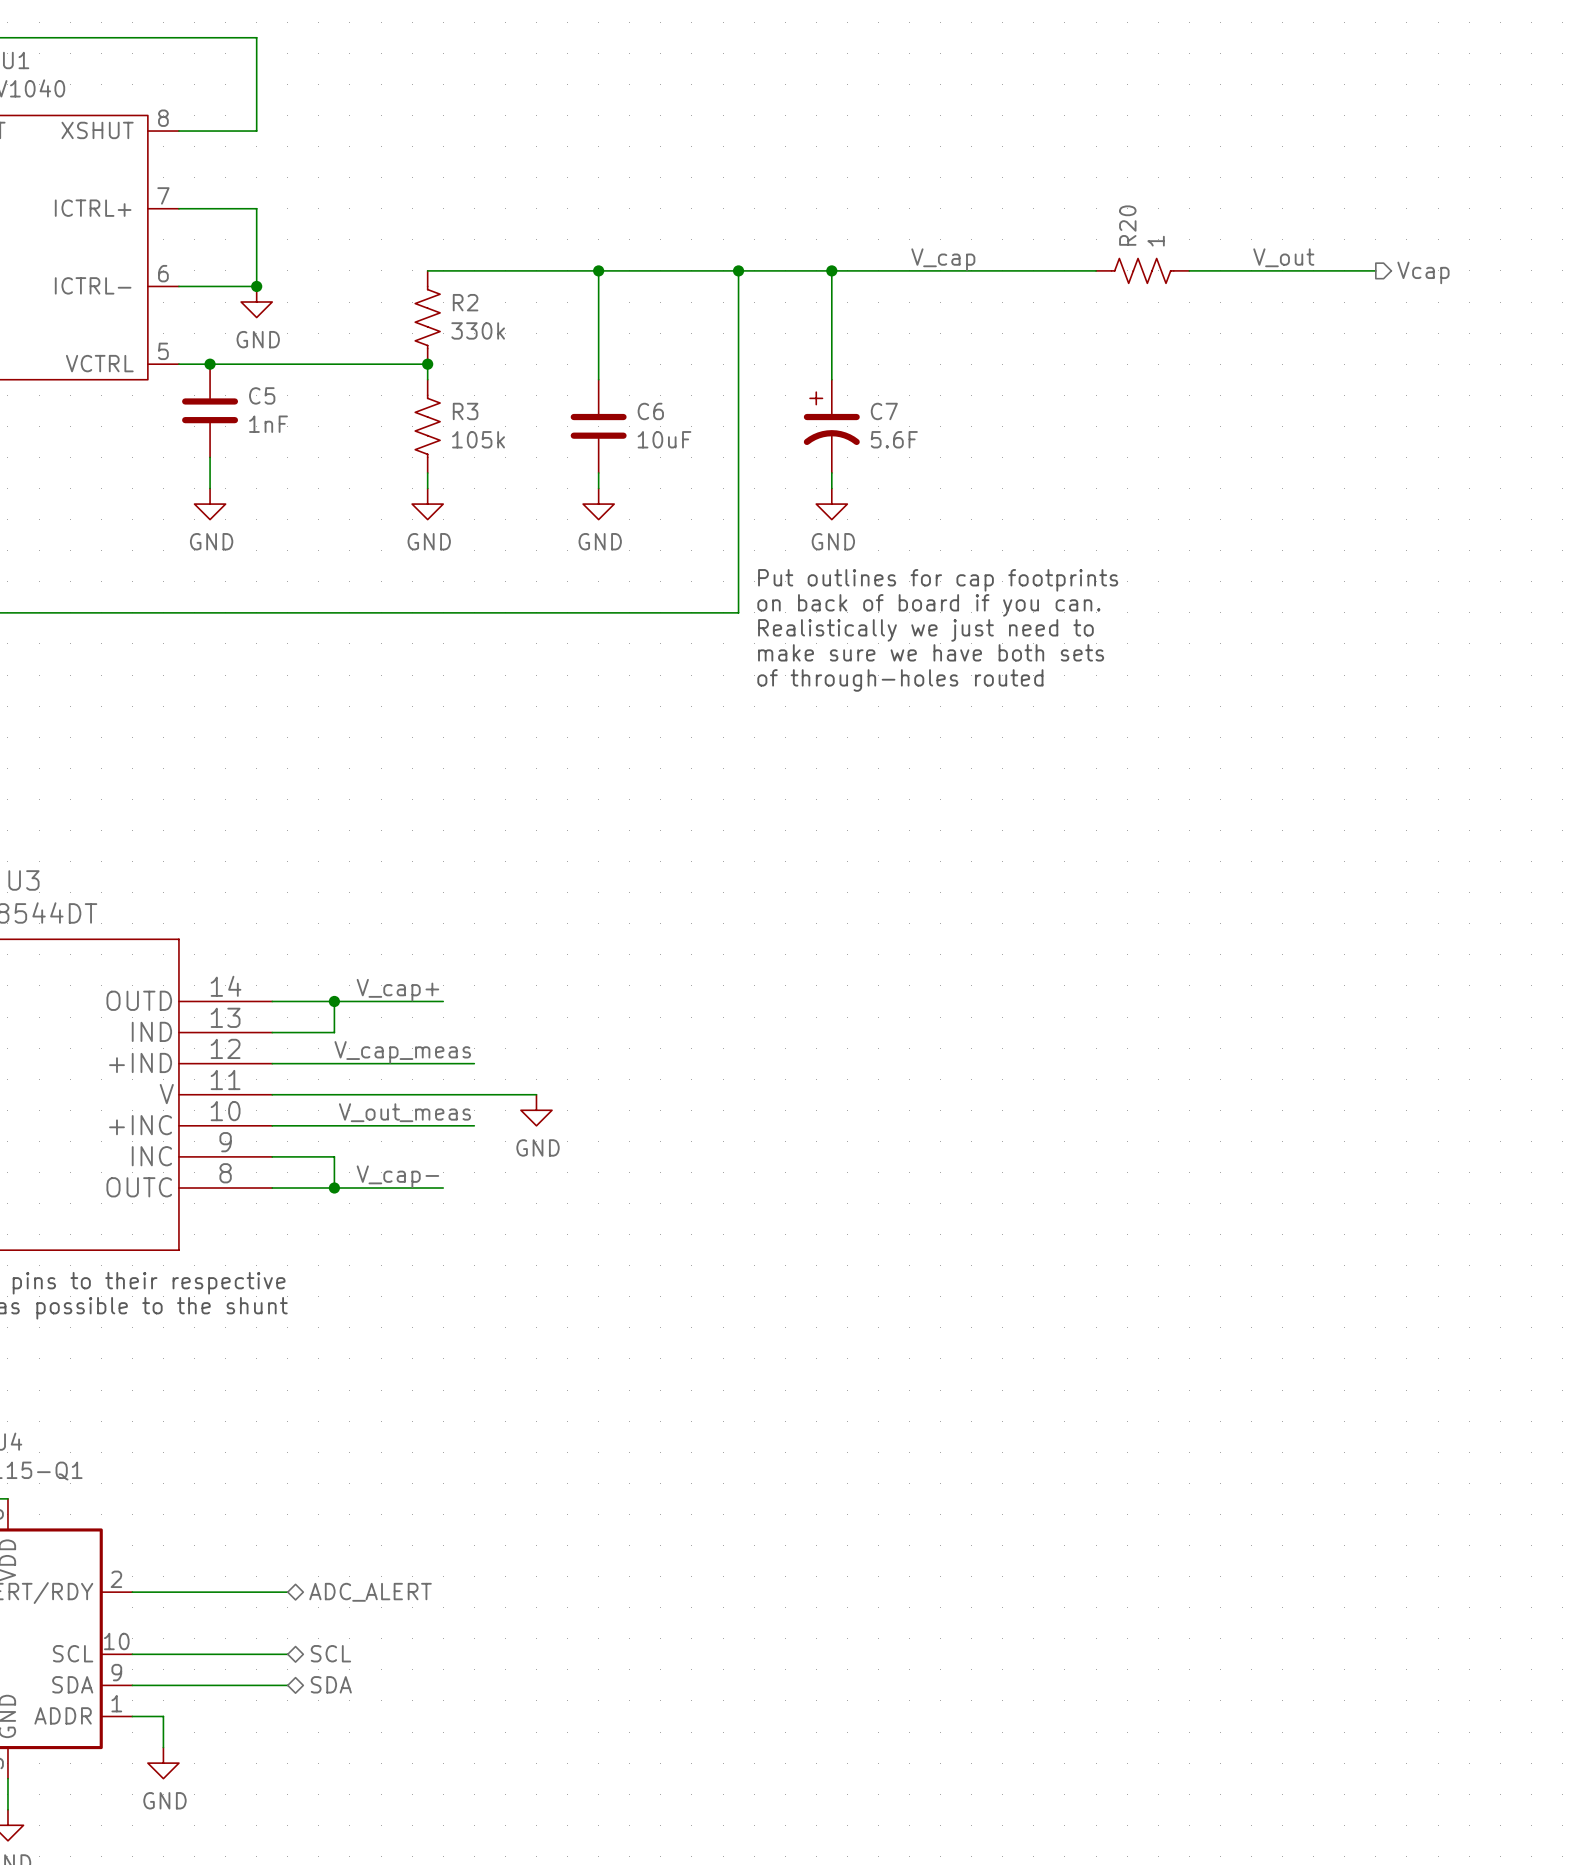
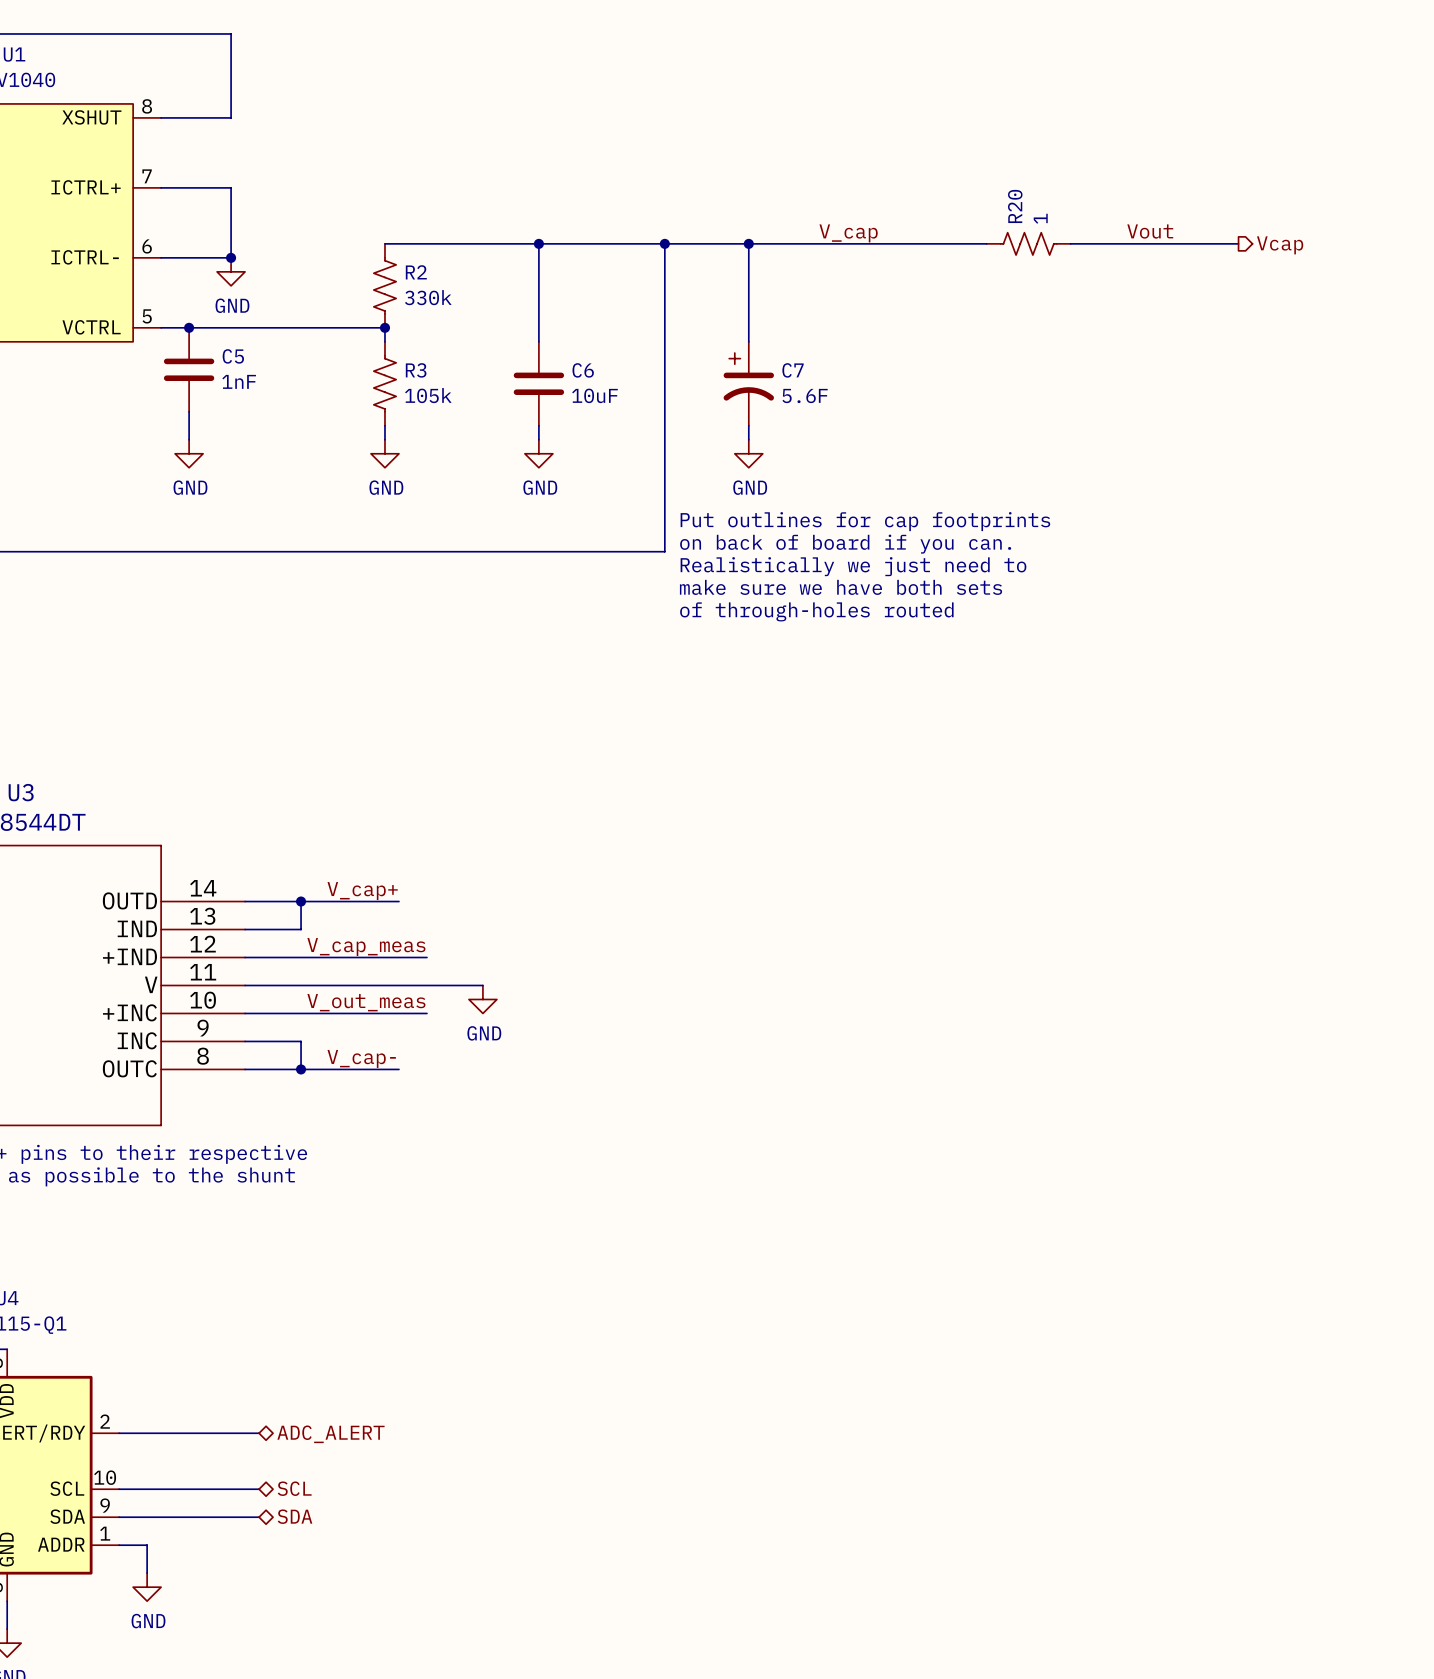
label: V_out (1283, 257) -> Vout (1150, 231)

